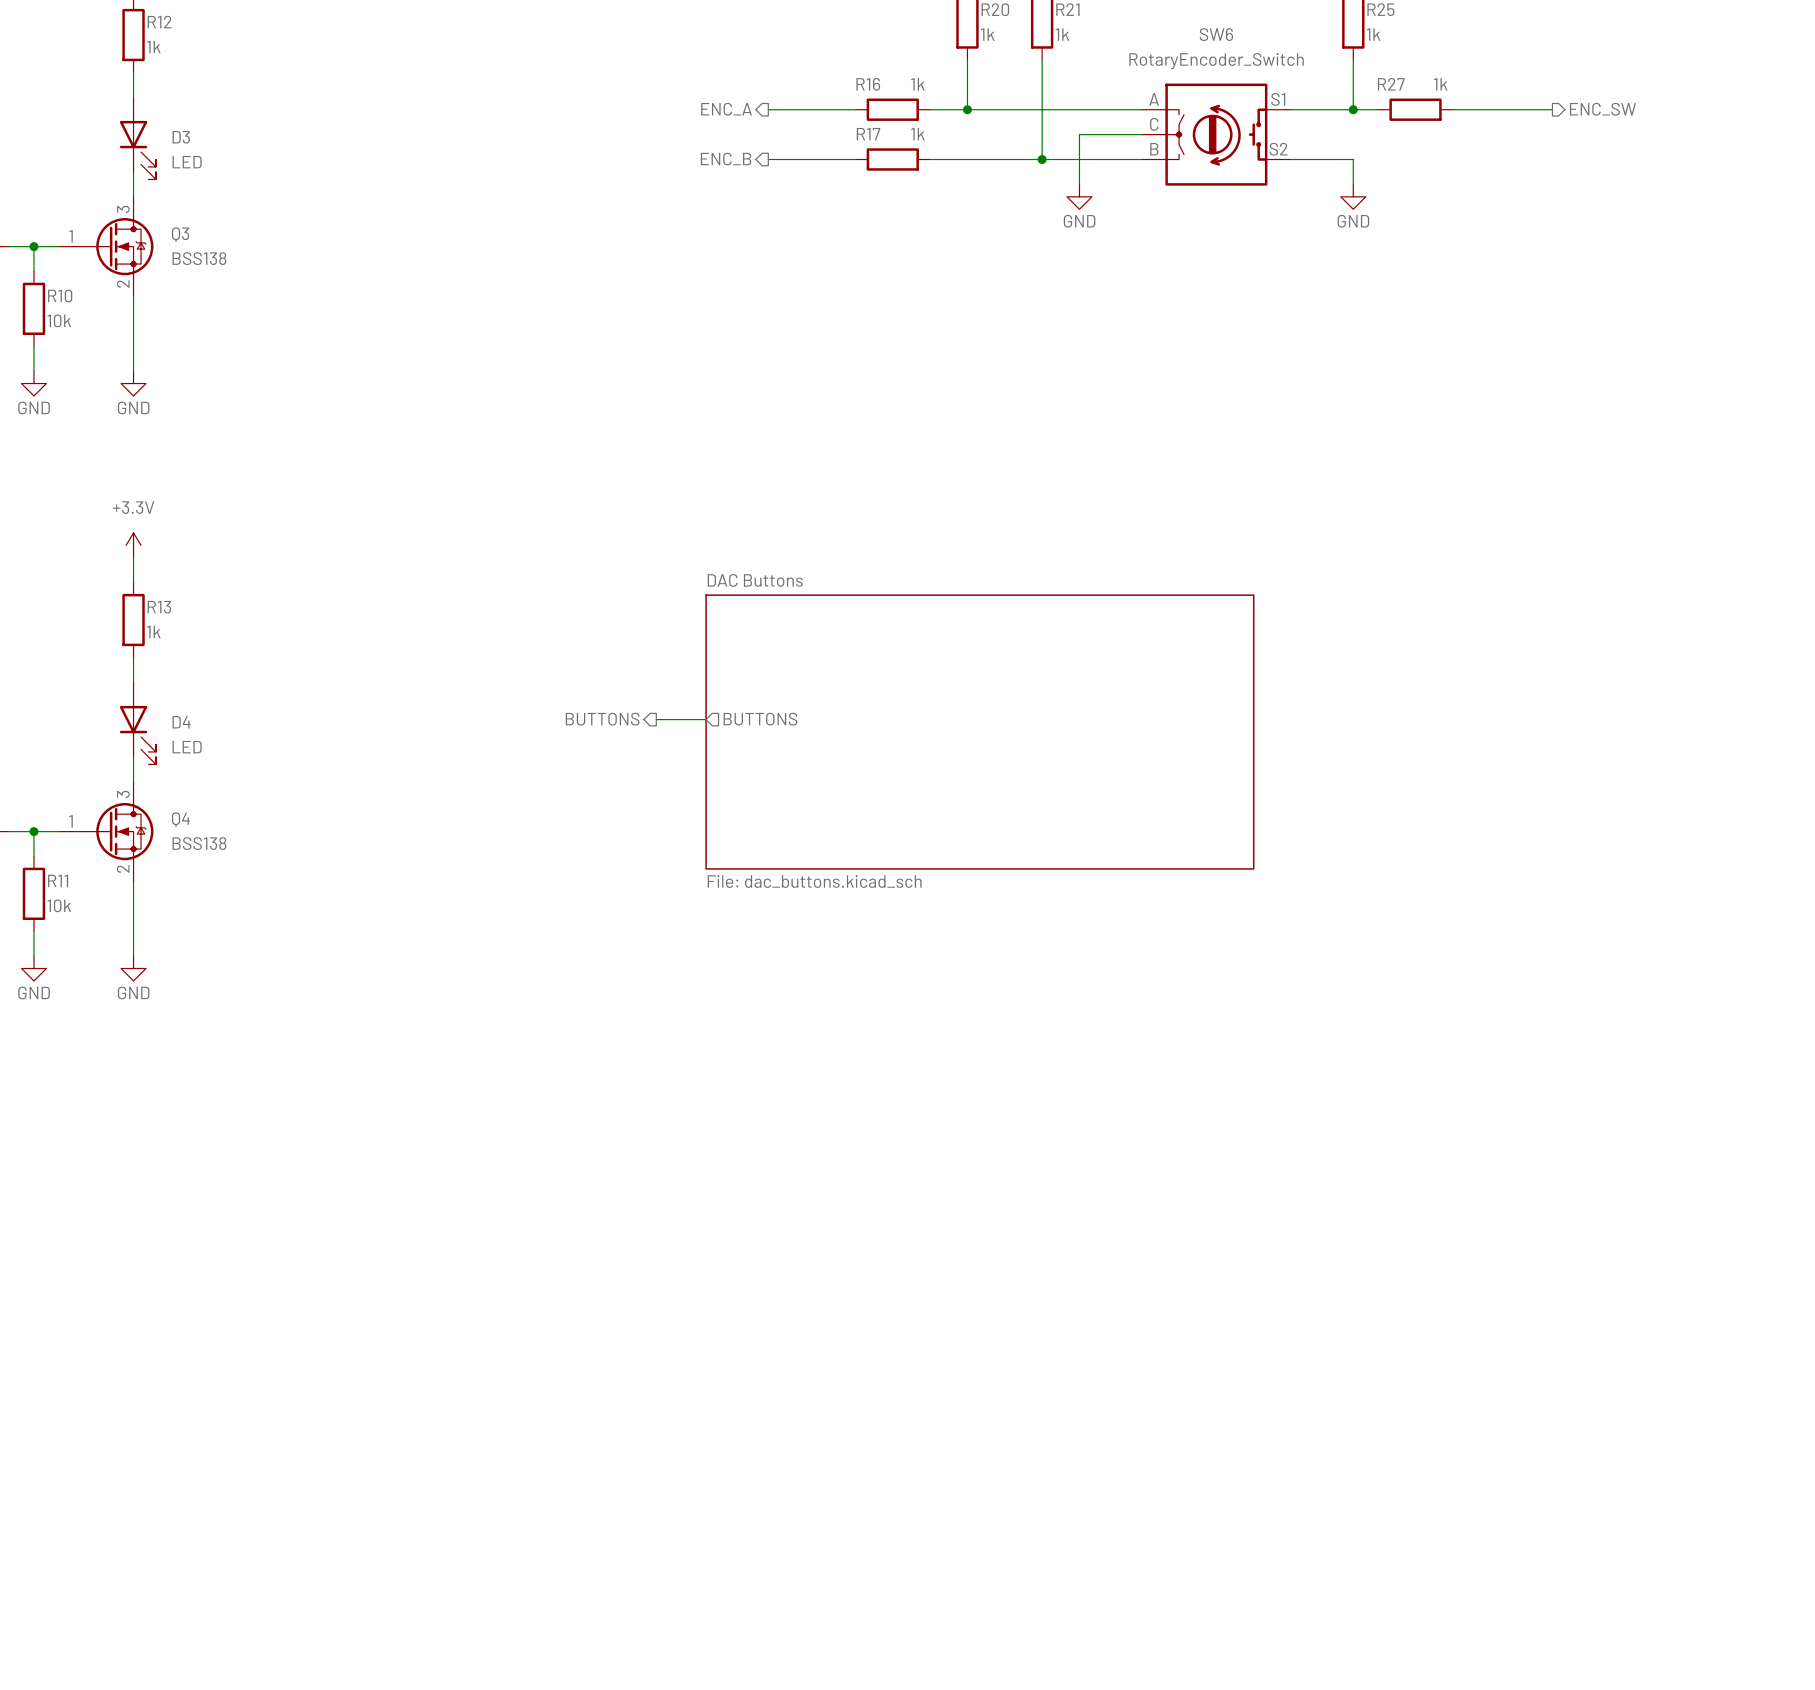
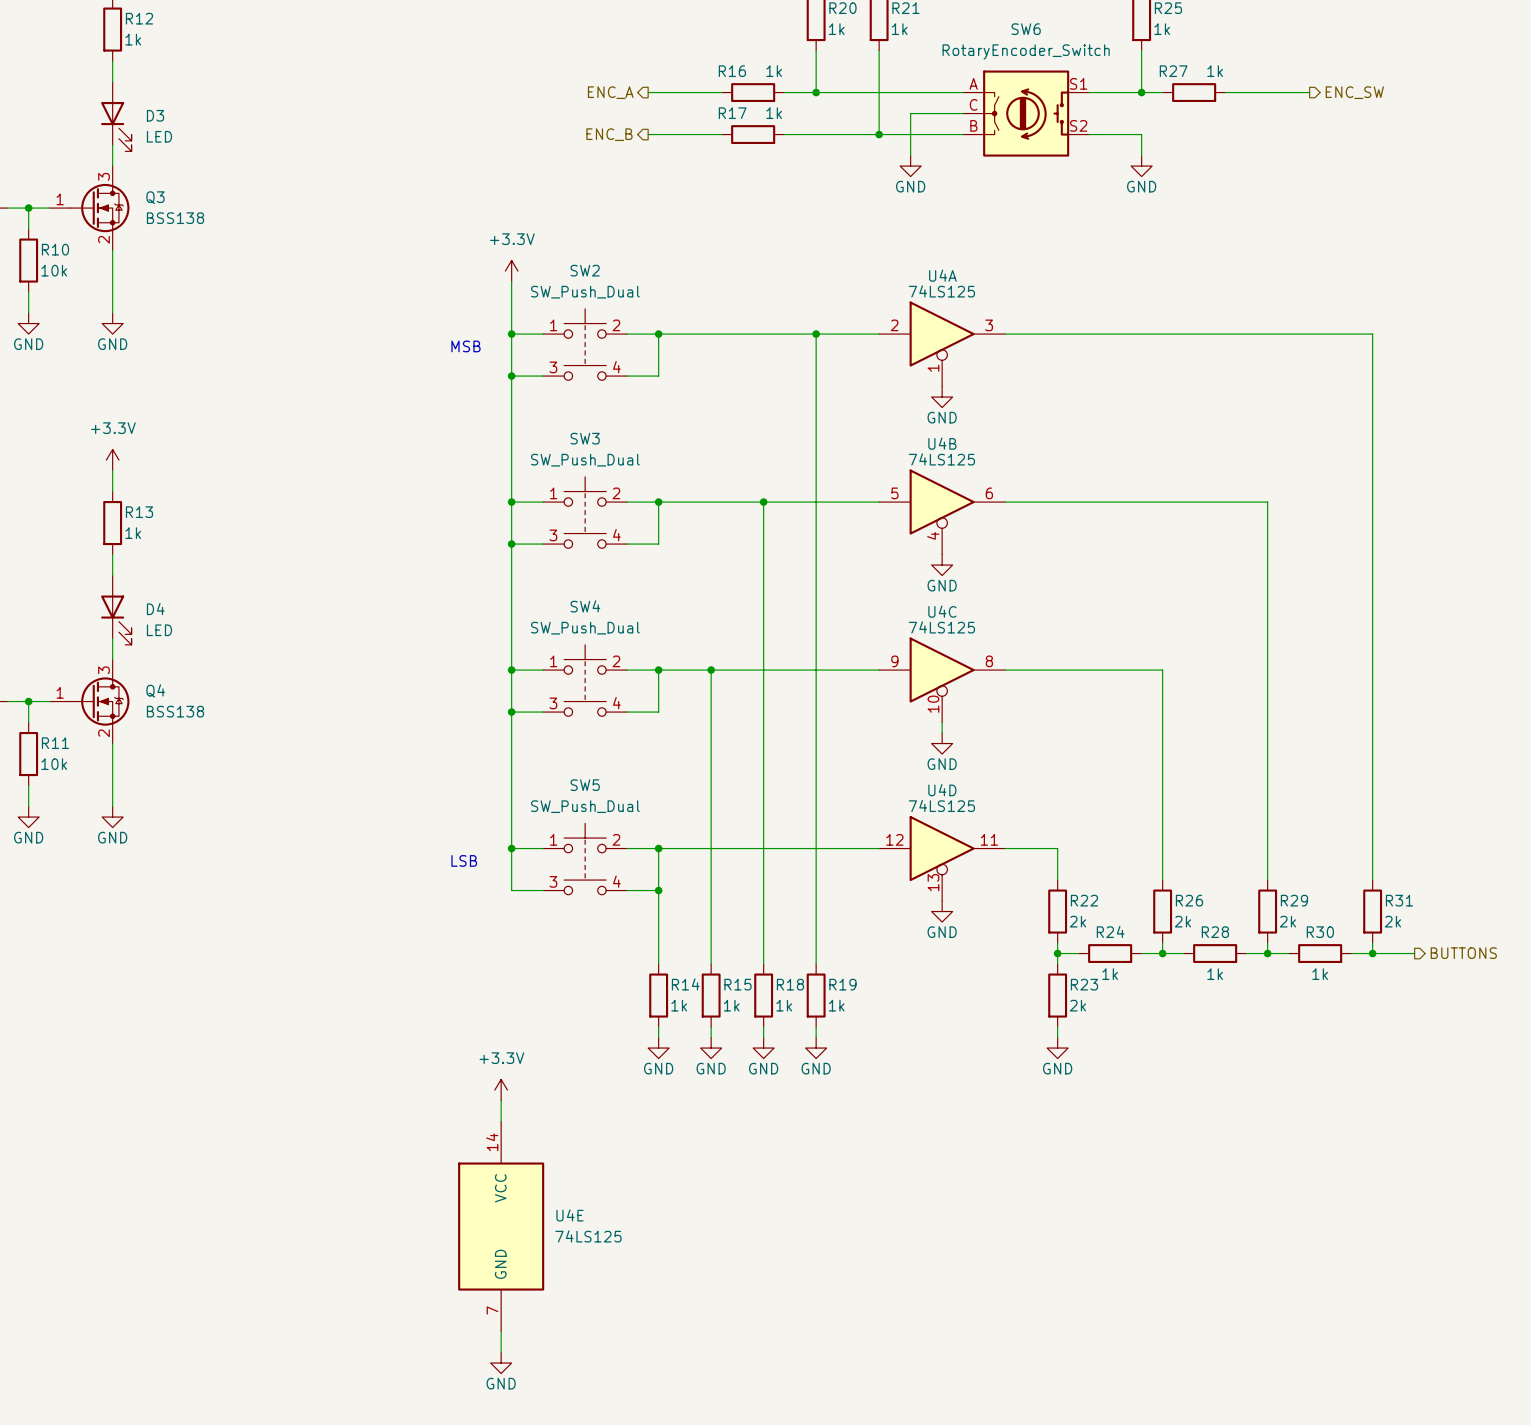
power symbol: none -> +3.3V (511, 271)
wire: none -> (511, 281) (511, 890) (543, 890)
wire: none -> (511, 334) (543, 334)
junction: none -> (511, 334)
wire: none -> (627, 334) (879, 334)
wire: none -> (658, 334) (658, 376) (627, 376)
junction: none -> (658, 334)
wire: none -> (816, 334) (816, 964)
junction: none -> (816, 334)
wire: none -> (1005, 334) (1372, 334) (1372, 880)
U4A: none -> 74LS125 (942, 344)
SW2: none -> SW_Push_Dual (585, 344)
text: none -> MSB (465, 346)
wire: none -> (511, 376) (543, 376)
junction: none -> (511, 376)
power symbol: none -> GND (942, 397)
wire: none -> (511, 502) (543, 502)
junction: none -> (511, 502)
wire: none -> (658, 502) (658, 544) (627, 544)
junction: none -> (658, 502)
wire: none -> (763, 502) (763, 964)
junction: none -> (763, 502)
wire: none -> (1005, 502) (1267, 502) (1267, 880)
U4B: none -> 74LS125 (942, 512)
SW3: none -> SW_Push_Dual (585, 512)
wire: none -> (511, 544) (543, 544)
junction: none -> (511, 544)
power symbol: none -> GND (942, 565)
hierarchical label: BUTTONS (602, 719) -> none
wire: (656, 719) (706, 719) -> none
sheet pin: BUTTONS (760, 719) -> none
sheet DAC Buttons: File: dac_buttons.kicad_sch (979, 732) -> none
wire: none -> (511, 670) (543, 670)
junction: none -> (511, 670)
wire: none -> (627, 670) (879, 670)
wire: none -> (658, 670) (658, 712) (627, 712)
junction: none -> (658, 670)
wire: none -> (711, 670) (711, 964)
junction: none -> (711, 670)
wire: none -> (1005, 670) (1162, 670) (1162, 880)
SW4: none -> SW_Push_Dual (585, 680)
U4C: none -> 74LS125 (942, 680)
wire: none -> (511, 712) (543, 712)
junction: none -> (511, 712)
wire: none -> (942, 722) (942, 733)
power symbol: none -> GND (942, 743)
wire: none -> (511, 848) (543, 848)
junction: none -> (511, 848)
wire: none -> (627, 848) (879, 848)
wire: none -> (658, 848) (658, 964)
junction: none -> (658, 848)
wire: none -> (1005, 848) (1057, 848) (1057, 880)
U4D: none -> 74LS125 (942, 858)
SW5: none -> SW_Push_Dual (585, 859)
text: none -> LSB (464, 860)
wire: none -> (627, 890) (658, 890)
junction: none -> (658, 890)
power symbol: none -> GND (942, 911)
R22: none -> 2k (1057, 911)
R26: none -> 2k (1162, 911)
R29: none -> 2k (1267, 911)
R31: none -> 2k (1372, 911)
wire: none -> (1057, 943) (1057, 964)
wire: none -> (1162, 943) (1162, 953)
wire: none -> (1267, 943) (1267, 953)
wire: none -> (1372, 943) (1372, 953)
hierarchical label: none -> BUTTONS (1463, 953)
wire: none -> (1057, 953) (1078, 953)
junction: none -> (1057, 953)
R24: none -> 1k (1110, 953)
wire: none -> (1141, 953) (1183, 953)
junction: none -> (1162, 953)
R28: none -> 1k (1215, 953)
wire: none -> (1246, 953) (1288, 953)
junction: none -> (1267, 953)
R30: none -> 1k (1320, 953)
wire: none -> (1351, 953) (1414, 953)
junction: none -> (1372, 953)
R14: none -> 1k (658, 995)
R15: none -> 1k (711, 995)
R18: none -> 1k (763, 995)
R19: none -> 1k (816, 995)
R23: none -> 2k (1057, 995)
wire: none -> (658, 1027) (658, 1037)
wire: none -> (711, 1027) (711, 1037)
wire: none -> (763, 1027) (763, 1037)
wire: none -> (816, 1027) (816, 1037)
wire: none -> (1057, 1027) (1057, 1037)
power symbol: none -> GND (658, 1048)
power symbol: none -> GND (711, 1048)
power symbol: none -> GND (763, 1048)
power symbol: none -> GND (816, 1048)
power symbol: none -> GND (1057, 1048)
power symbol: none -> +3.3V (501, 1090)
wire: none -> (501, 1100) (501, 1121)
U4E: none -> 74LS125 (501, 1226)
wire: none -> (501, 1331) (501, 1352)
power symbol: none -> GND (501, 1363)

